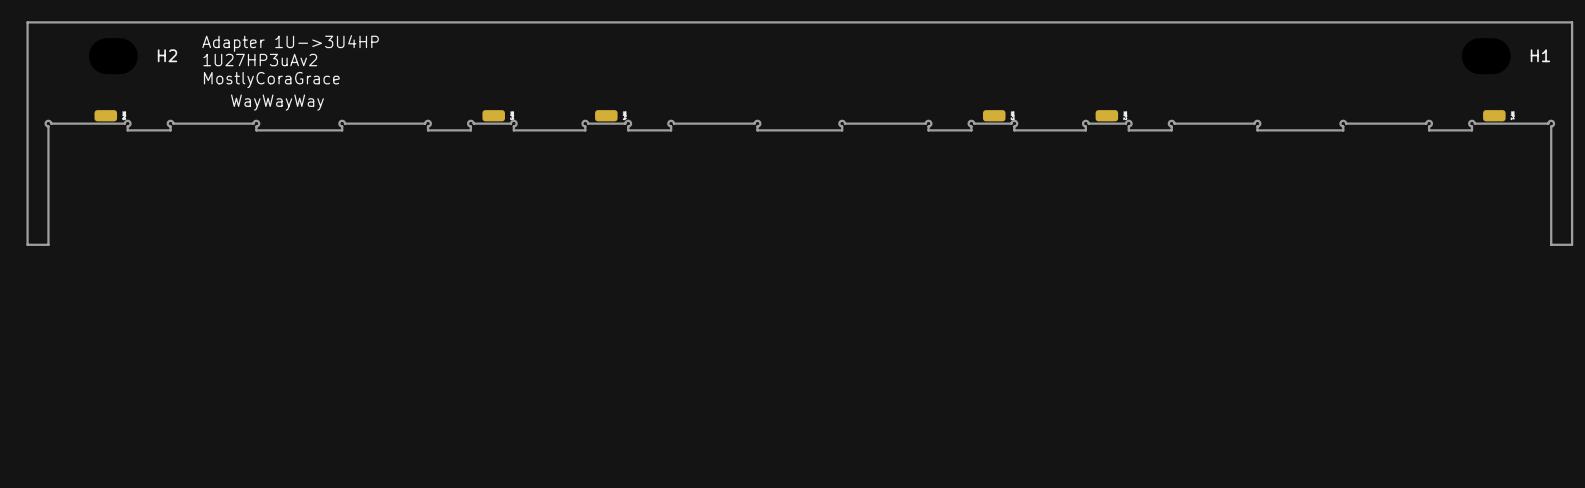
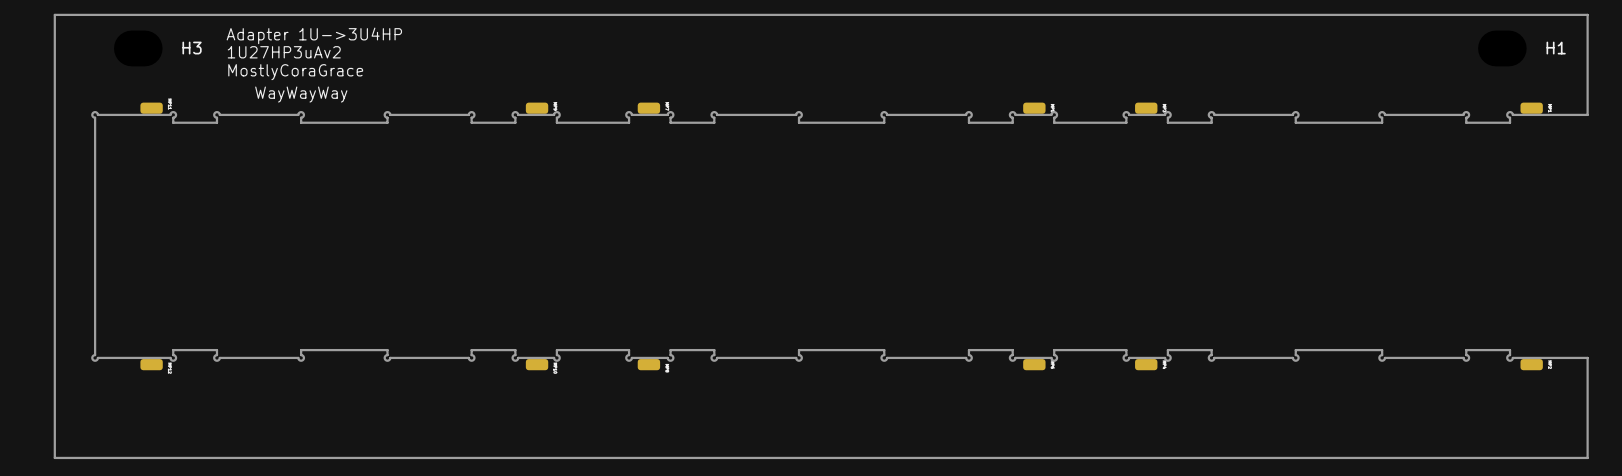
board edge: (29, 22) (27, 22) (27, 244) (48, 244) (48, 126) (45, 123) (48, 120) (51, 123) (124, 123) (128, 120) (130, 123) (127, 126) (127, 130) (170, 130) (167, 123) (170, 120) (173, 123) (253, 123) (256, 120) (259, 123) (256, 126) (256, 130) (342, 130) (339, 123) (342, 120) (345, 123) (425, 123) (428, 120) (430, 123) (428, 130) (470, 130) (470, 126) (468, 123) (470, 120) (473, 123) (510, 123) (513, 120) (516, 123) (513, 130) (585, 130) (585, 126) (582, 123) (584, 120) (588, 123) (625, 123) (628, 120) (631, 123) (628, 130) (671, 130) (671, 126) (668, 123) (670, 120) (673, 123) (754, 123) (757, 120) (760, 123) (757, 130) (842, 130) (839, 123) (842, 120) (844, 123) (925, 123) (928, 120) (931, 123) (928, 130) (971, 130) (971, 126) (968, 123) (970, 120) (974, 123) (1011, 123) (1014, 120) (1017, 123) (1014, 130) (1085, 130) (1085, 126) (1083, 123) (1085, 120) (1088, 123) (1125, 123) (1128, 120) (1131, 123) (1128, 130) (1171, 130) (1171, 126) (1168, 123) (1171, 120) (1174, 123) (1254, 123) (1257, 120) (1260, 123) (1257, 130) (1343, 130) (1343, 126) (1340, 123) (1342, 120) (1346, 123) (1426, 123) (1429, 120) (1431, 123) (1429, 130) (1471, 130) (1471, 126) (1469, 123) (1471, 120) (1474, 123) (1548, 123) (1551, 120) (1554, 123) (1551, 126) (1551, 244) (1572, 244) (1572, 123) -> (54, 14) (54, 457) (1587, 457) (1587, 357) (1512, 357) (1509, 360) (1507, 358) (1510, 355) (1510, 350) (1466, 350) (1466, 355) (1469, 358) (1466, 360) (1463, 357) (1384, 357) (1381, 360) (1379, 357) (1382, 355) (1382, 350) (1295, 350) (1295, 355) (1298, 358) (1295, 360) (1292, 357) (1214, 357) (1211, 360) (1208, 358) (1211, 355) (1211, 350) (1167, 350) (1167, 355) (1170, 357) (1168, 360) (1165, 357) (1129, 357) (1126, 360) (1123, 358) (1126, 355) (1126, 350) (1054, 350) (1054, 355) (1057, 357) (1055, 360) (1051, 357) (1015, 357) (1012, 360) (1009, 358) (1012, 355) (1012, 350) (968, 350) (968, 355) (971, 358) (969, 360) (966, 357) (887, 357) (883, 360) (881, 357) (884, 355) (884, 350) (799, 350) (799, 355) (801, 358) (799, 360) (796, 357) (717, 357) (714, 360) (711, 358) (714, 355) (714, 350) (670, 350) (670, 355) (673, 357) (671, 360) (667, 357) (631, 357) (628, 360) (626, 358) (629, 355) (629, 350) (556, 350) (556, 355) (559, 358) (557, 360) (554, 357) (518, 357) (514, 360) (512, 357) (515, 355) (515, 350) (471, 350) (471, 355) (474, 358) (471, 360) (468, 357) (390, 357) (387, 360) (384, 357) (387, 355) (387, 350) (301, 350) (301, 355) (303, 358) (301, 360) (298, 357) (219, 357) (216, 360) (214, 358) (216, 355) (216, 350) (173, 350) (173, 355) (176, 357) (173, 360) (170, 357) (97, 357) (94, 360) (92, 358) (95, 355) (95, 117) (92, 114) (94, 112) (97, 114) (170, 114) (173, 112) (176, 114) (173, 117) (173, 122) (216, 122) (216, 117) (214, 114) (216, 112) (219, 114) (298, 114) (301, 112) (303, 115) (301, 117) (301, 122) (387, 122) (387, 117) (384, 114) (387, 112) (390, 114) (468, 114) (472, 112) (474, 115) (471, 117) (471, 122) (515, 122) (515, 117) (512, 114) (515, 112) (518, 114) (554, 114) (557, 112) (559, 115) (556, 117) (556, 122) (629, 122) (629, 117) (626, 114) (628, 112) (631, 114) (667, 114) (671, 112) (673, 115) (670, 117) (670, 122) (714, 122) (714, 117) (711, 114) (714, 112) (717, 114) (796, 114) (799, 112) (801, 115) (799, 117) (799, 122) (884, 122) (884, 117) (881, 114) (884, 112) (887, 114) (966, 114) (969, 112) (971, 115) (968, 117) (968, 122) (1012, 122) (1012, 117) (1009, 114) (1012, 112) (1015, 114) (1051, 114) (1055, 112) (1057, 115) (1054, 117) (1054, 122) (1126, 122) (1126, 117) (1123, 114) (1126, 112) (1129, 114) (1165, 114) (1168, 112) (1170, 115) (1167, 117) (1167, 122) (1211, 122) (1211, 117) (1208, 114) (1211, 112) (1214, 114) (1292, 114) (1296, 112) (1298, 115) (1295, 117) (1295, 122) (1382, 122) (1382, 117) (1379, 114) (1382, 112) (1384, 114) (1463, 114) (1466, 112) (1469, 115) (1466, 117) (1466, 122) (1510, 122) (1510, 117) (1507, 114) (1509, 112) (1512, 114) (1587, 114)
H2 name: H2 (167, 55) -> H3 (192, 48)
part position: (105, 115) -> (1034, 364)
part position: (493, 115) -> (1034, 108)
part position: (606, 115) -> (1146, 364)
part position: (994, 115) -> (1146, 108)
part position: (1106, 115) -> (1531, 364)
part position: (1494, 115) -> (1531, 108)
part: none -> (151, 108)
part: none -> (537, 108)
part: none -> (648, 108)
part: none -> (151, 364)
part: none -> (537, 364)
part: none -> (648, 364)

